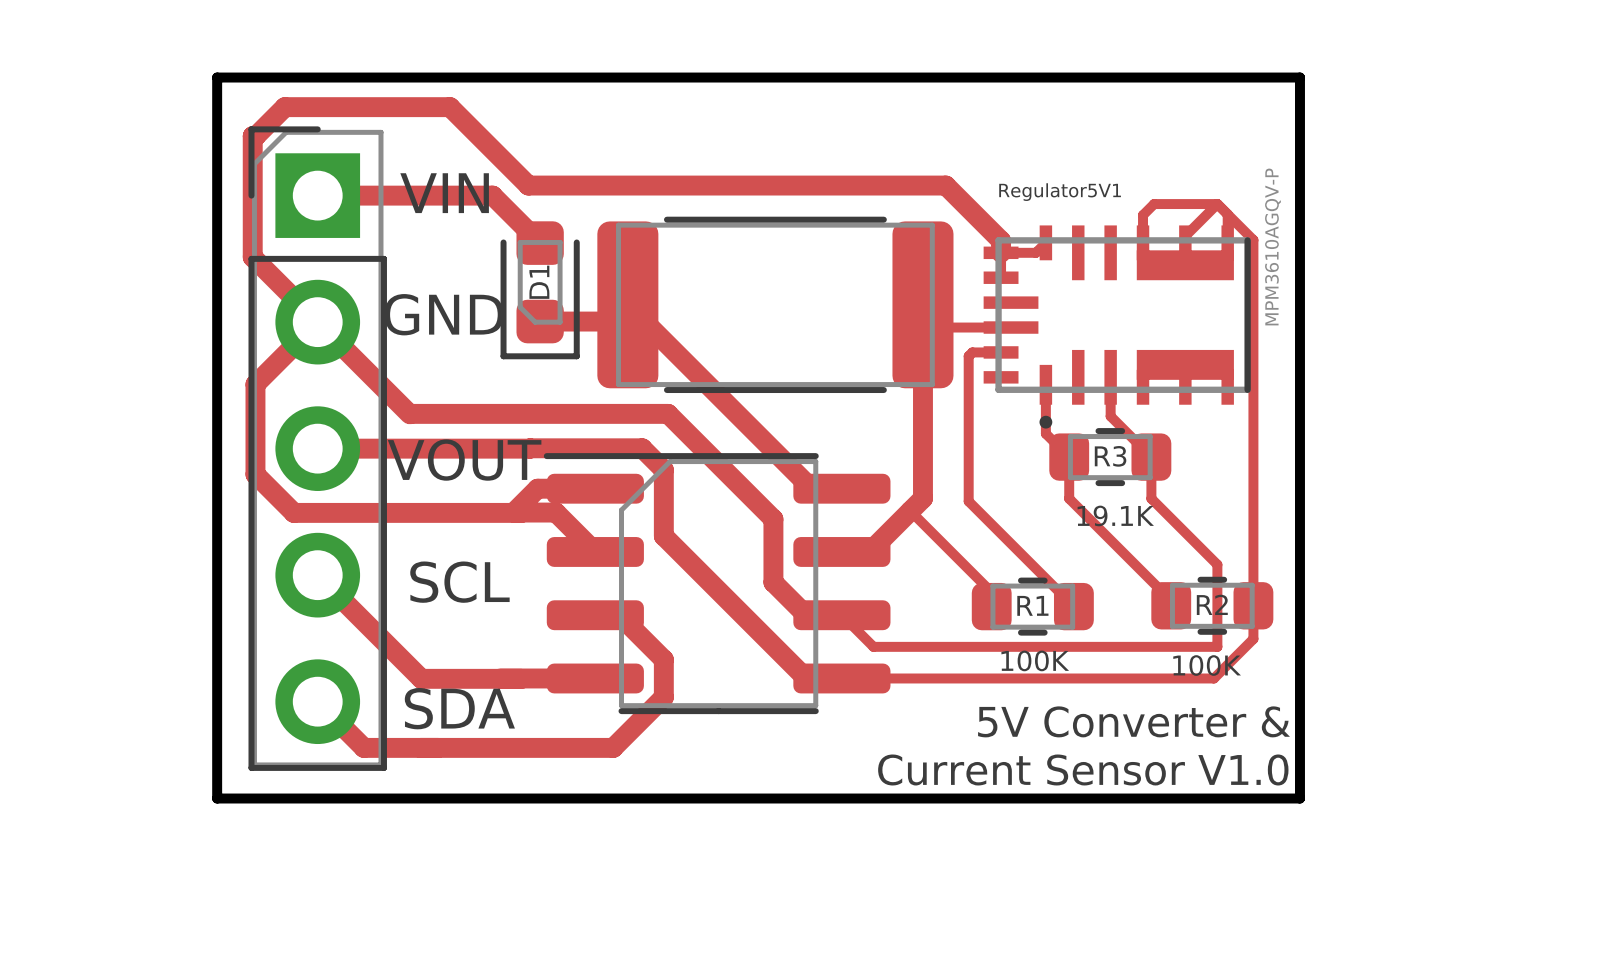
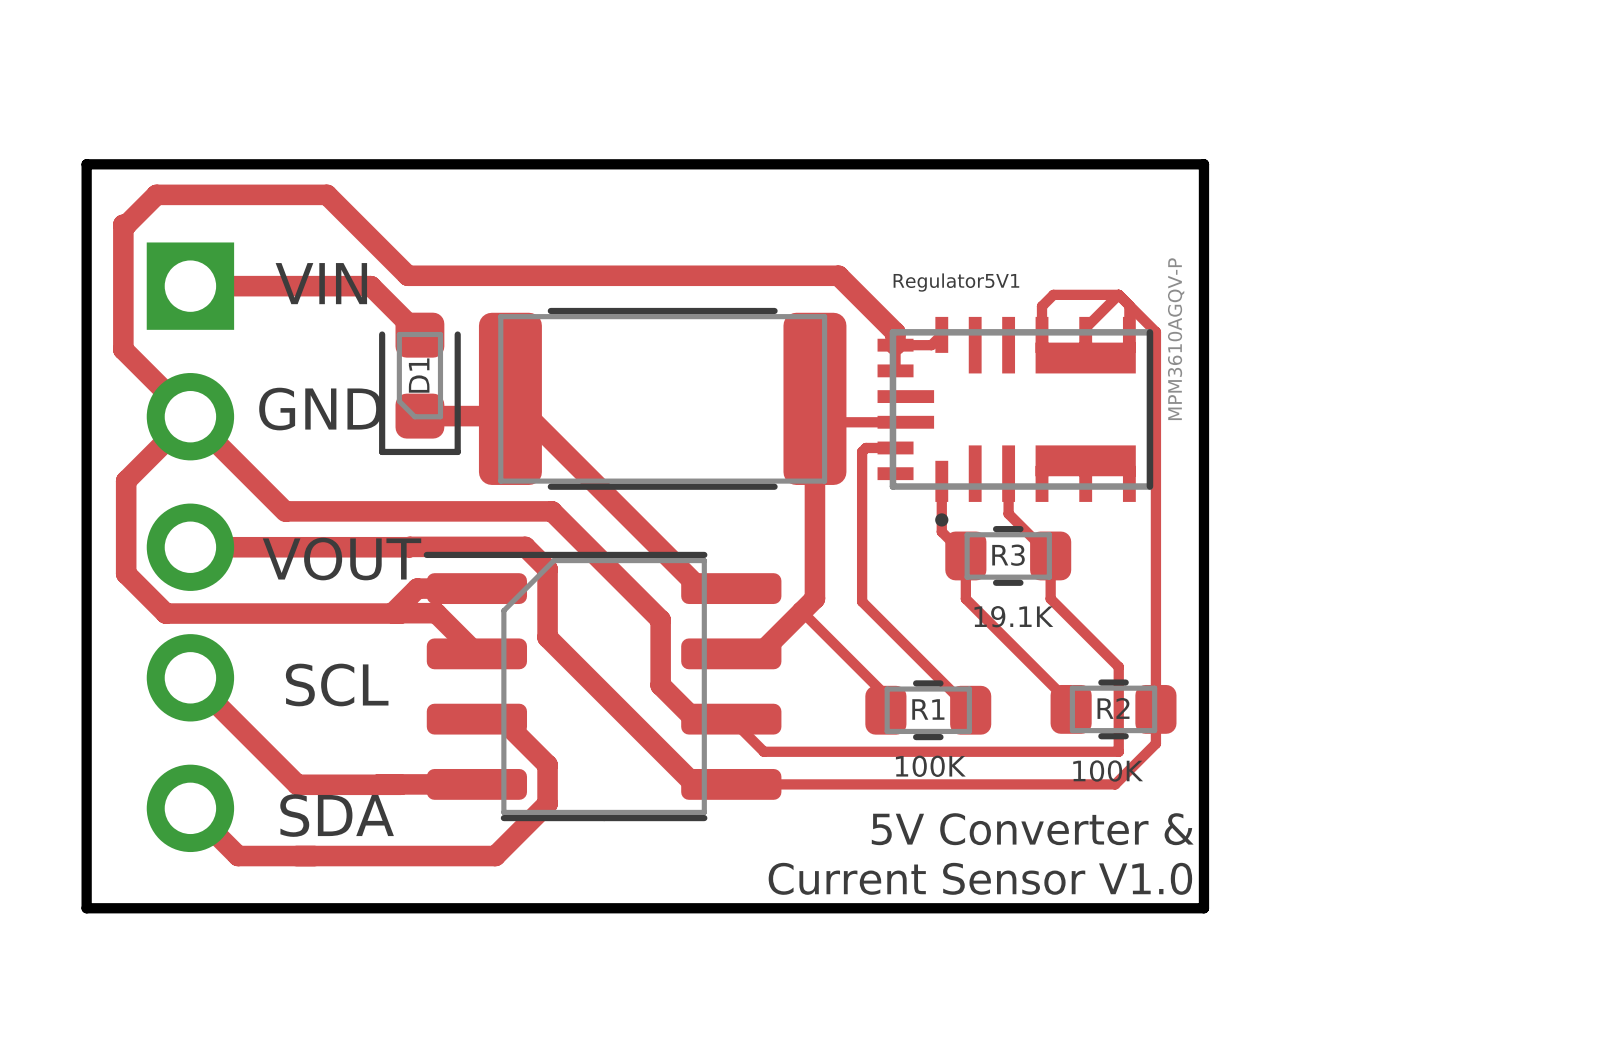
part side: top (317, 448) -> bottom (190, 547)

